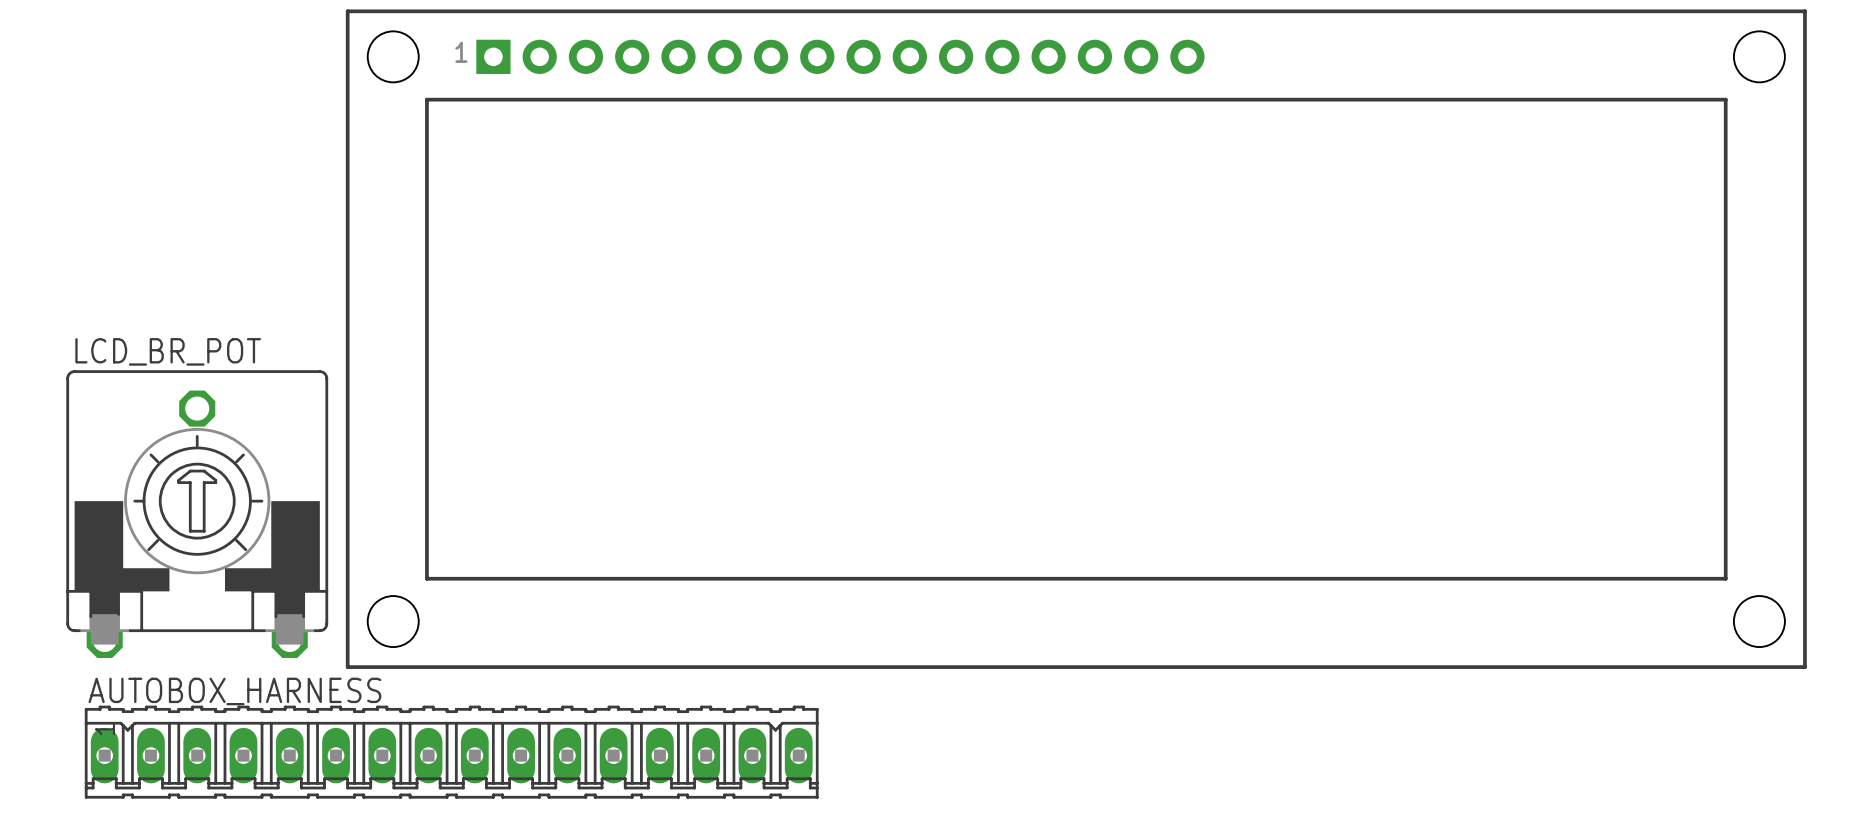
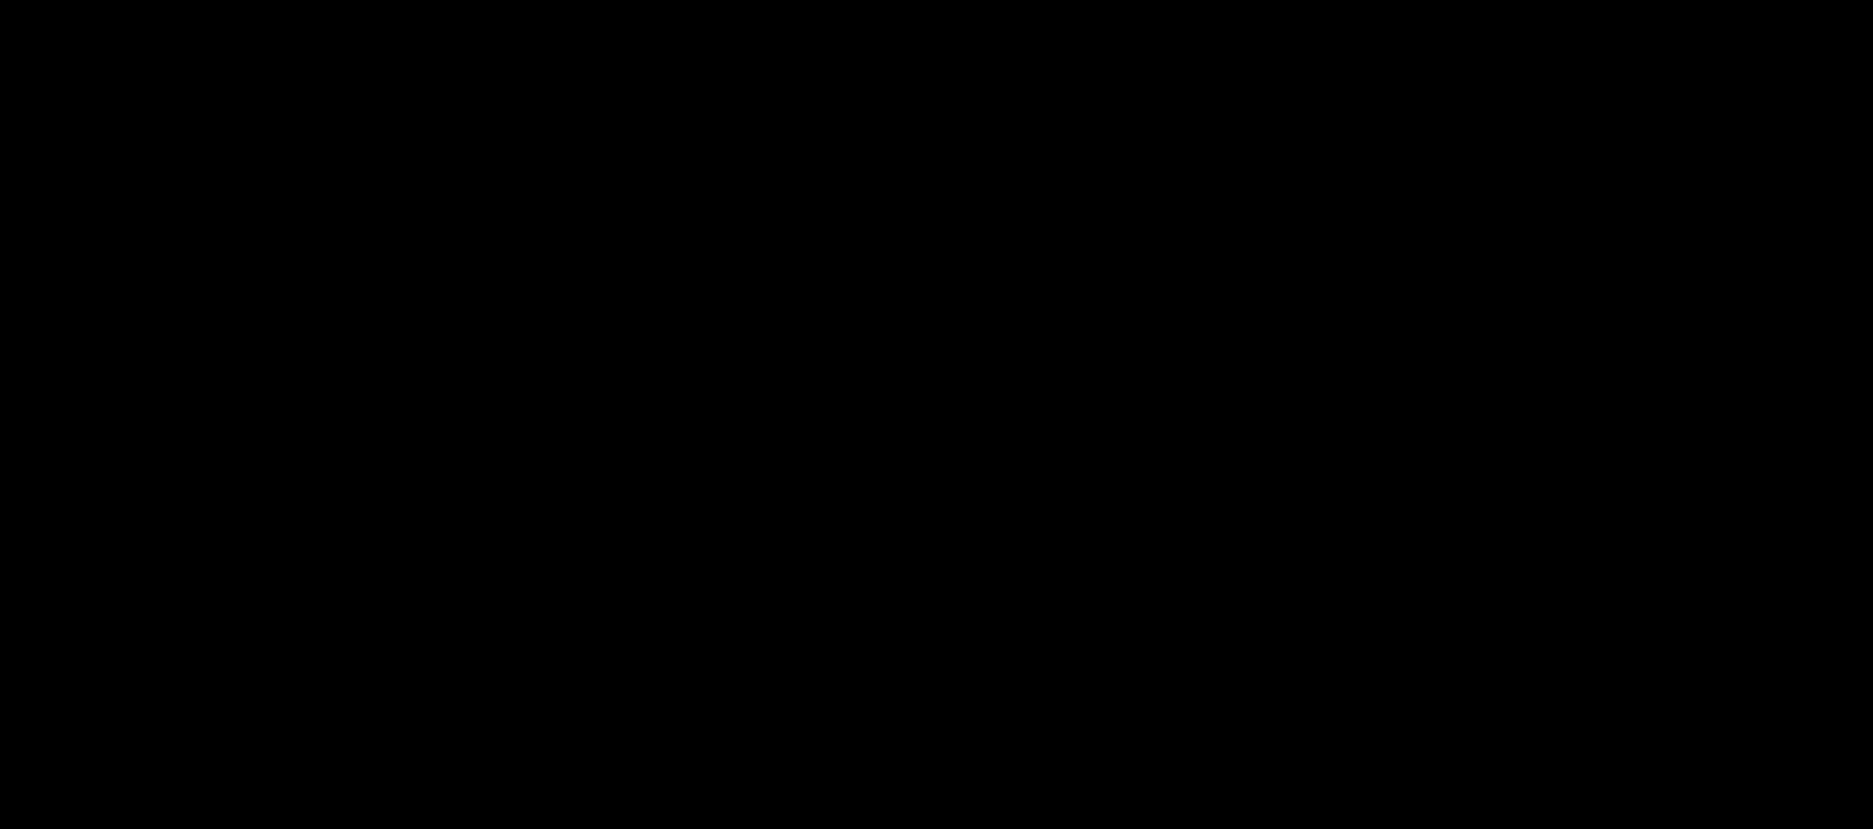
part: (1076, 339) -> none
LCD_BR_POT: (197, 514) -> none
AUTOBOX_HARNESS: (451, 752) -> none

